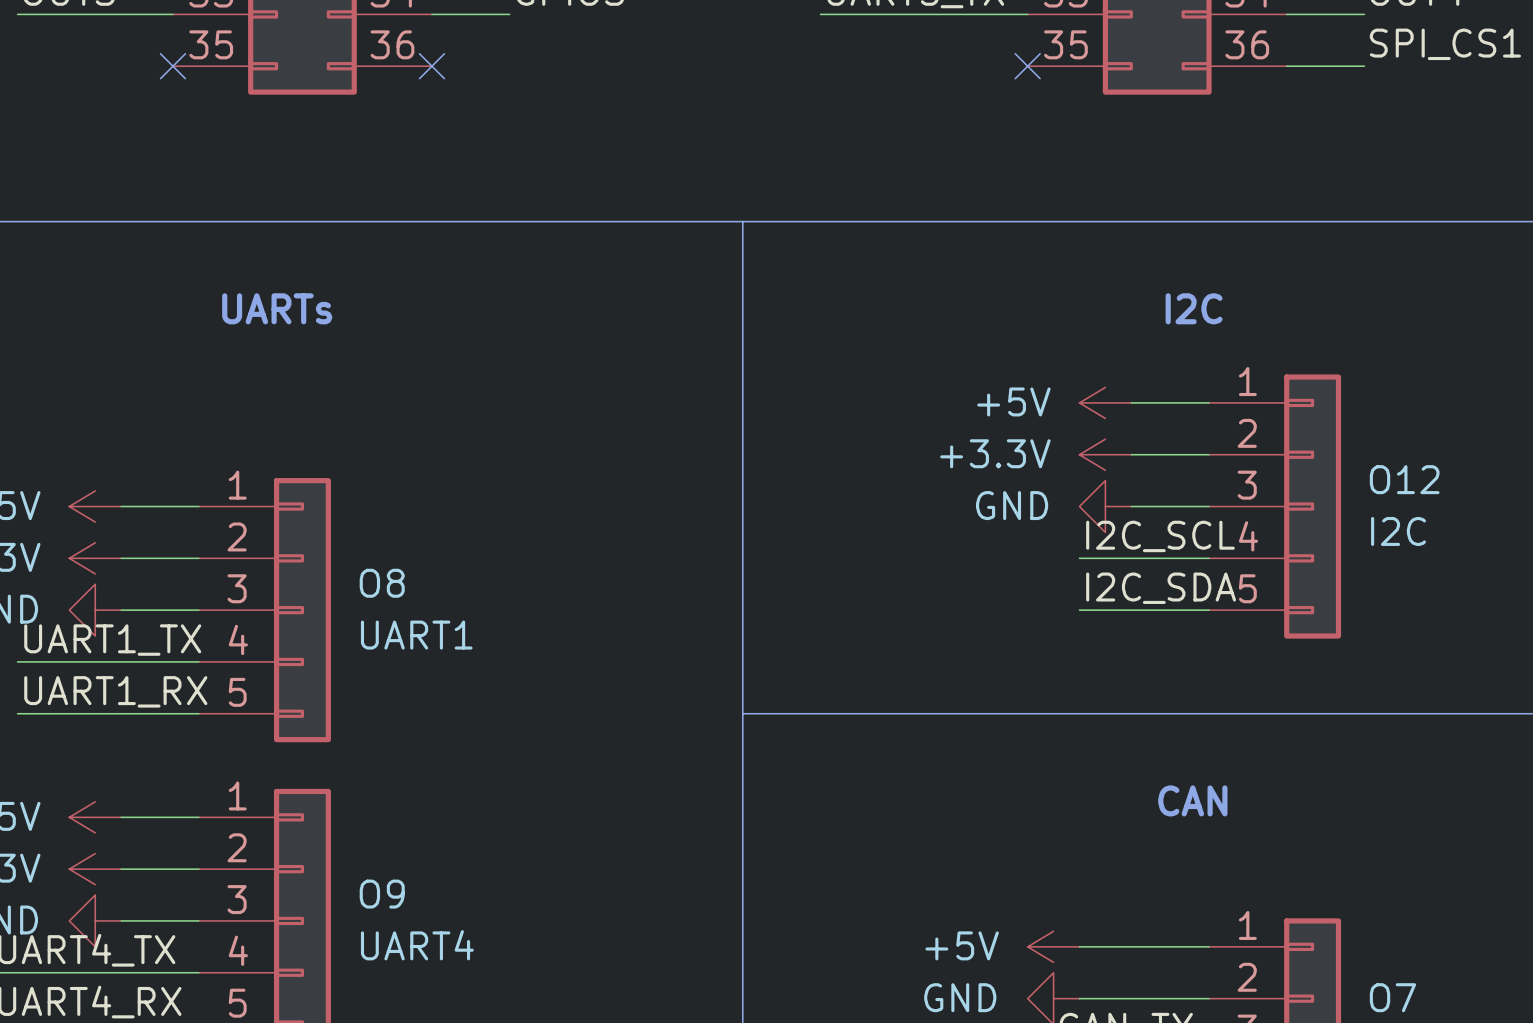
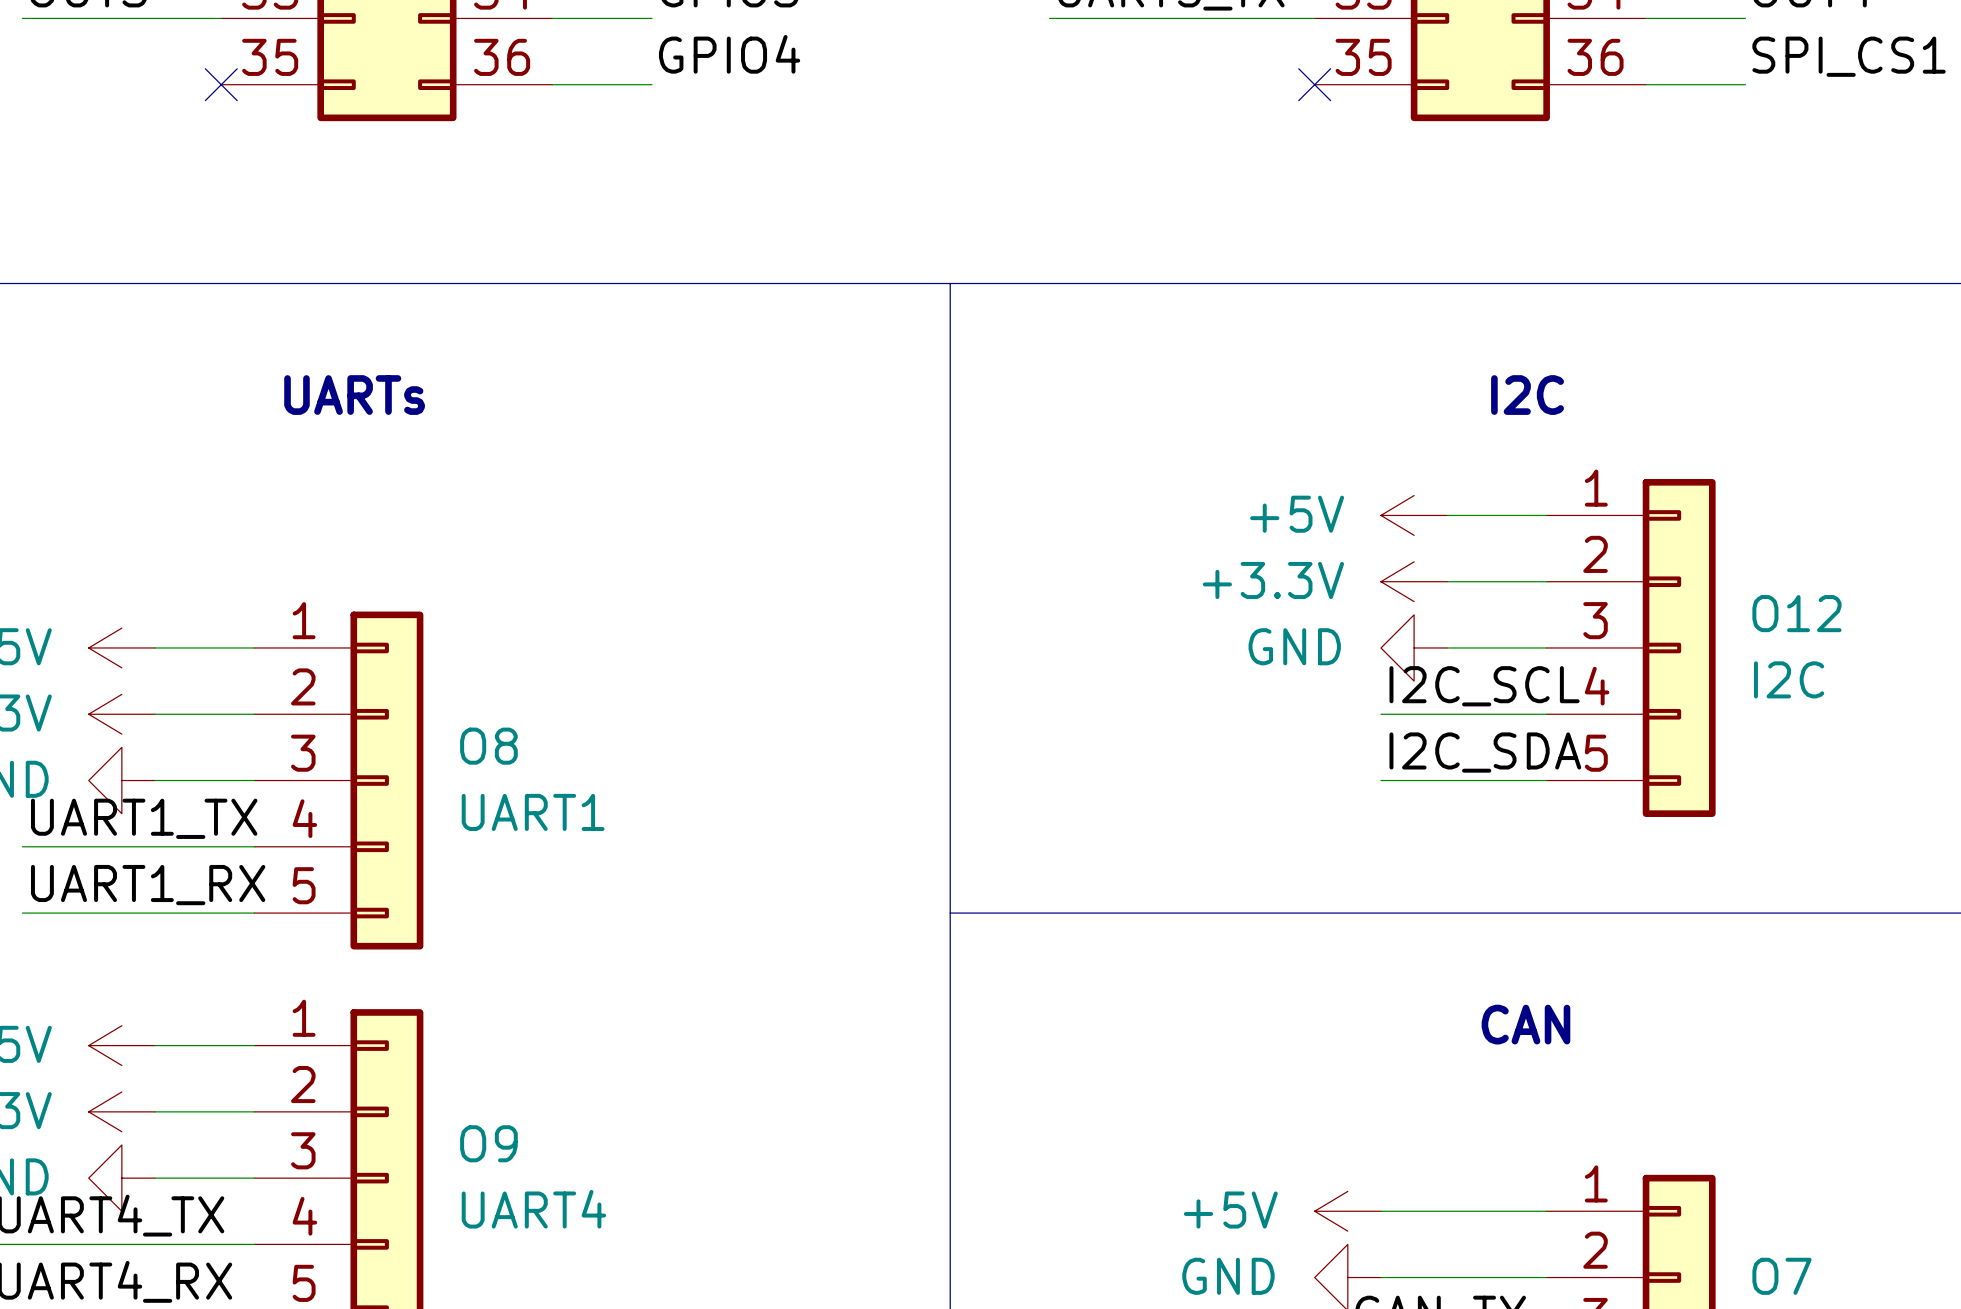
label: none -> GPIO4 (729, 54)
wire: none -> (552, 84) (652, 84)
no-connect mark: (431, 66) -> none

